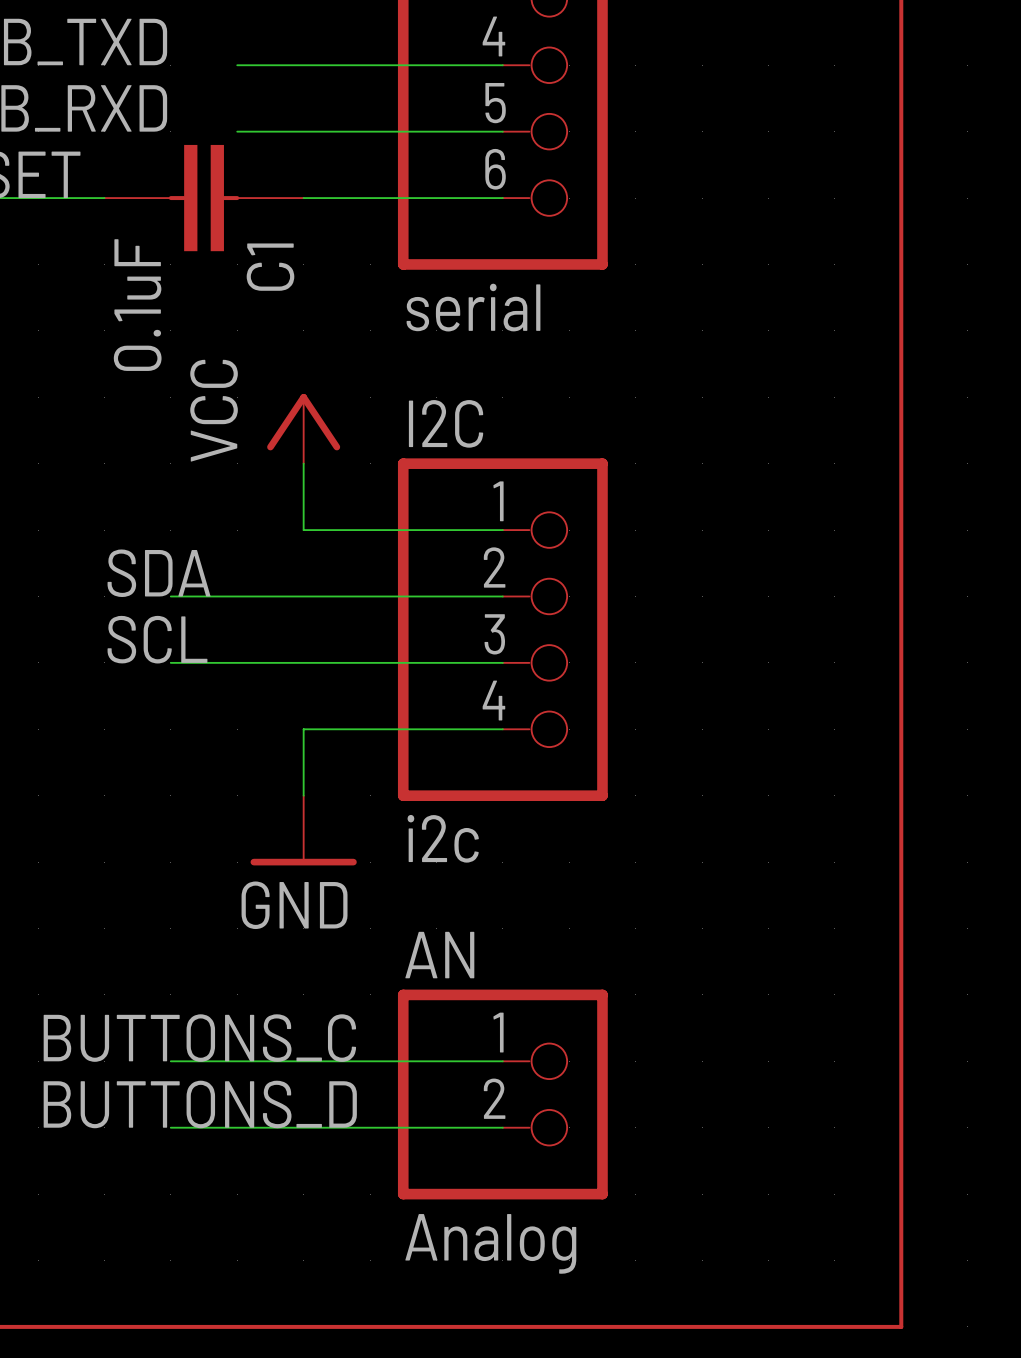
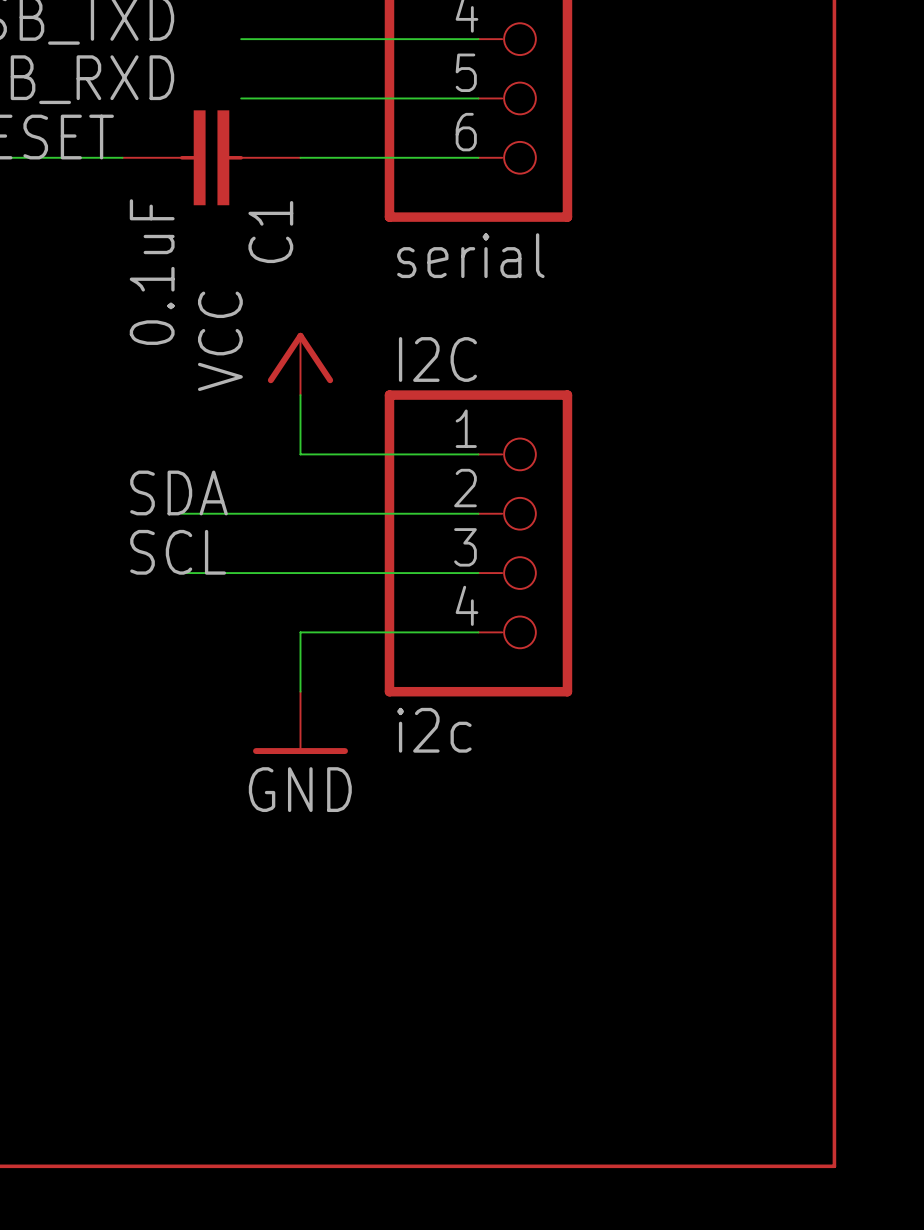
label: BUTTONS_C (199, 1038) -> none
wire: (170, 1061) (502, 1061) -> none
AN: Analog (502, 1094) -> none
label: BUTTONS_D (200, 1104) -> none
wire: (170, 1127) (502, 1127) -> none

